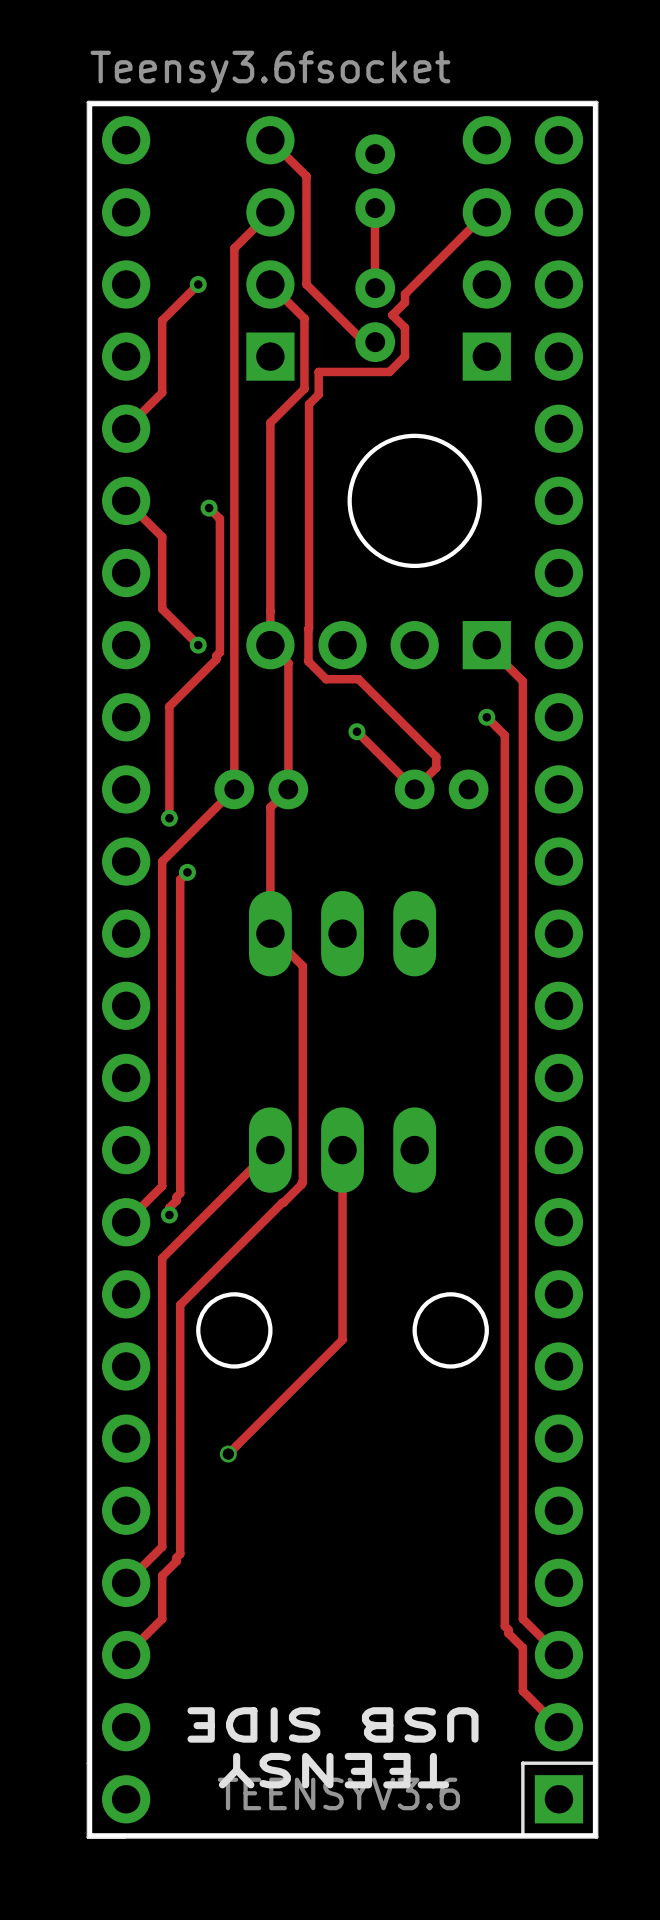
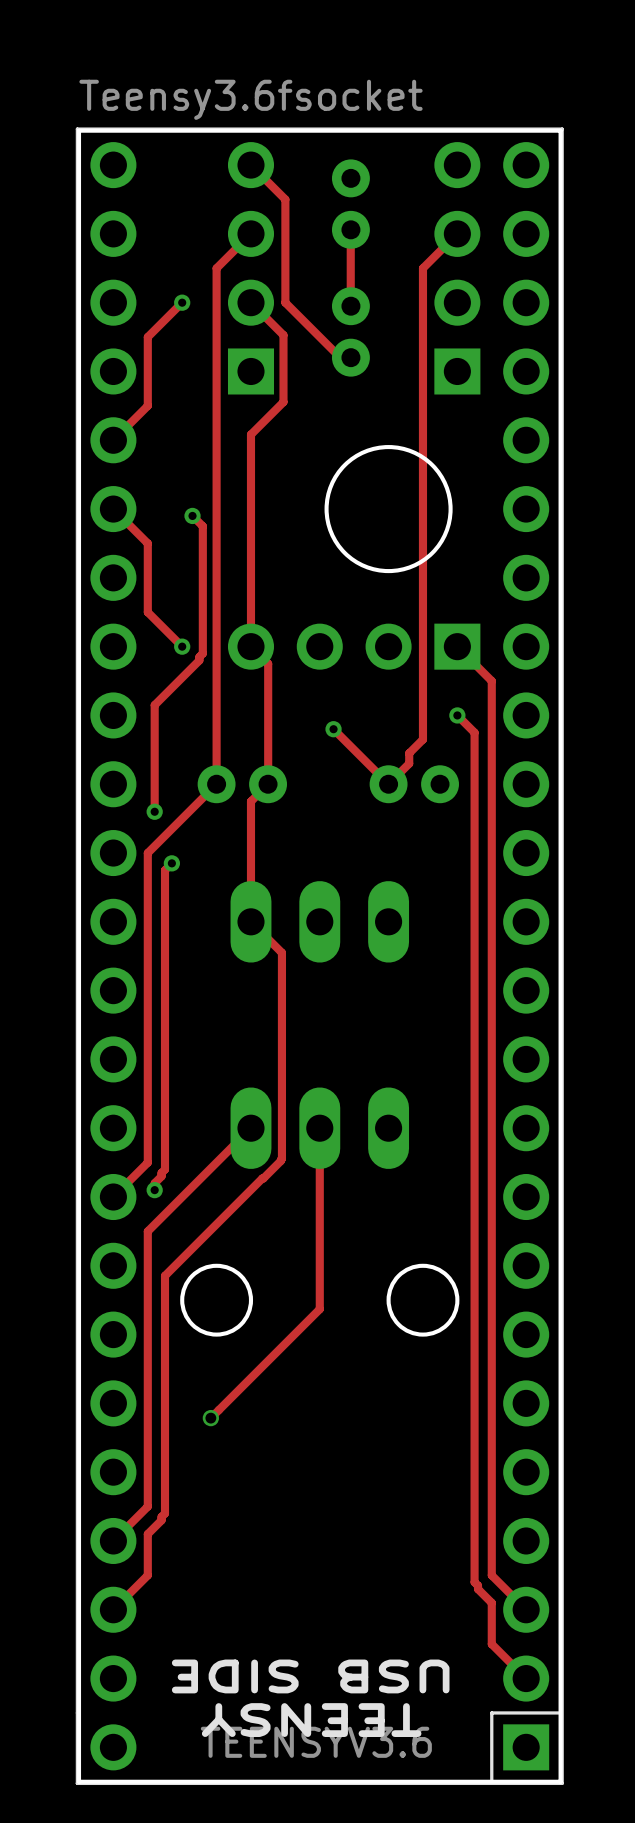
track: (450, 248) (405, 294) (405, 302) (392, 315) (405, 327) (405, 356) (389, 371) (318, 371) (318, 394) (309, 404) (308, 661) (326, 679) (358, 679) (436, 756) -> (422, 268) (422, 739) (409, 753)

